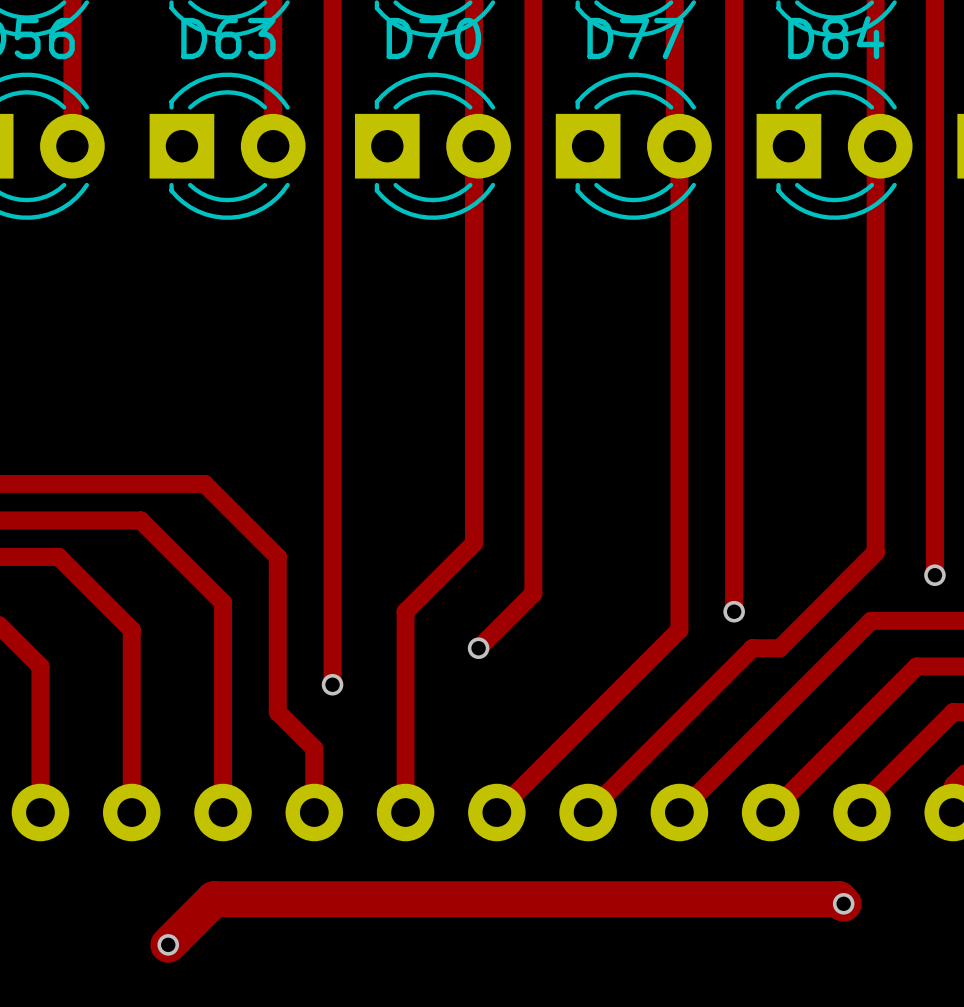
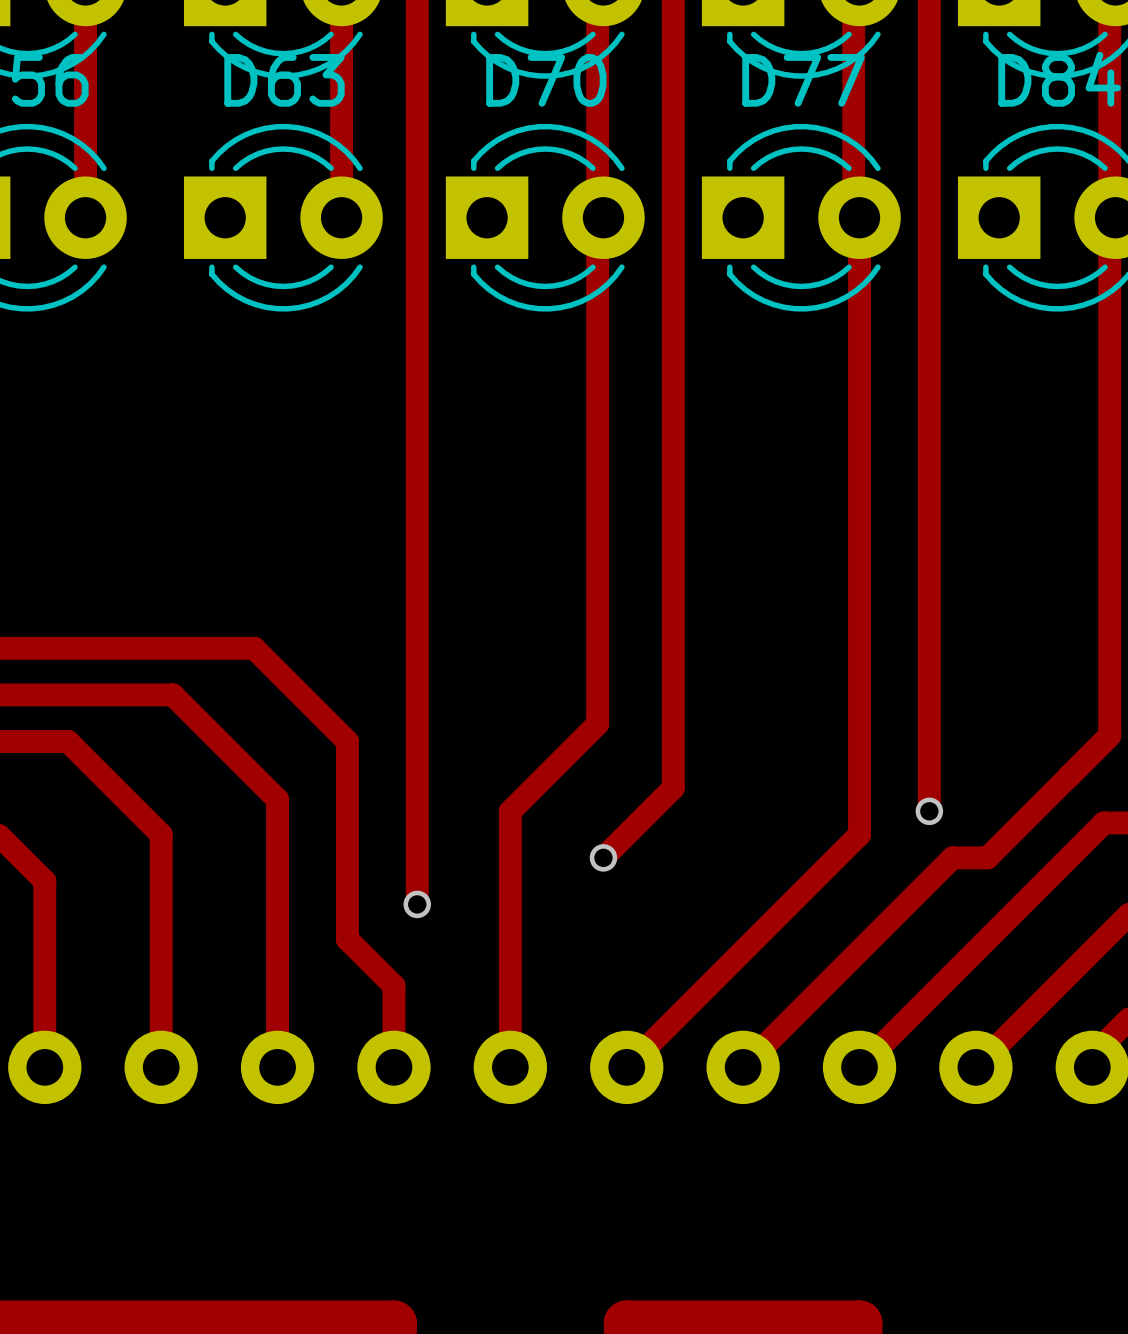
track: (843, 903) (839, 899) (213, 899) (168, 944) -> none
via: (843, 903) -> none
via: (168, 944) -> none

